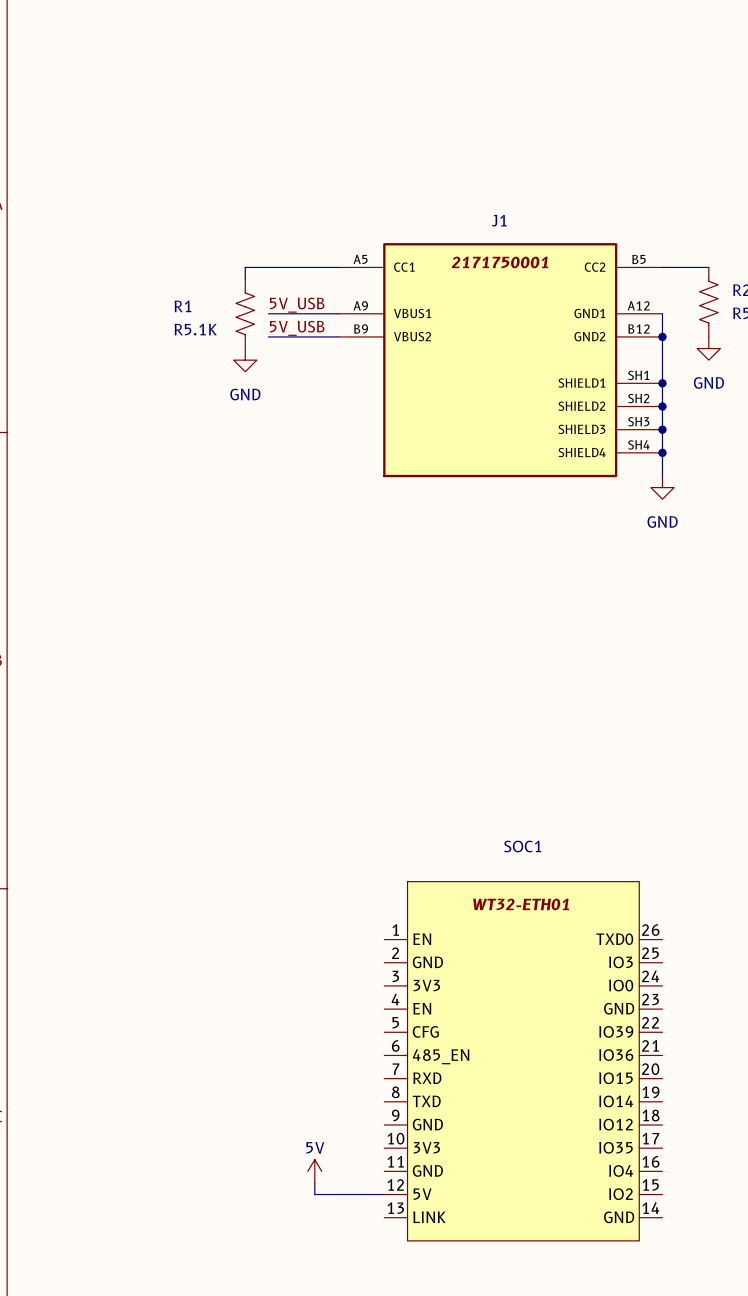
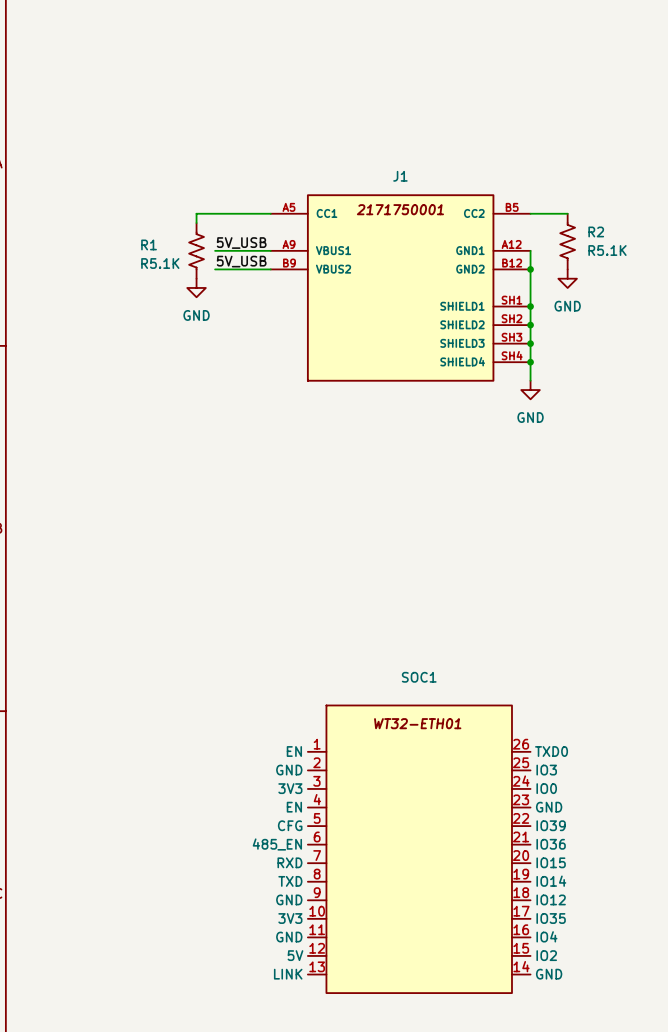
SOC1 symbol: [384, 881, 663, 1241] -> [307, 705, 531, 994]
power symbol: 5V (314, 1171) -> none
wire: (314, 1182) (314, 1194) (384, 1194) -> none

